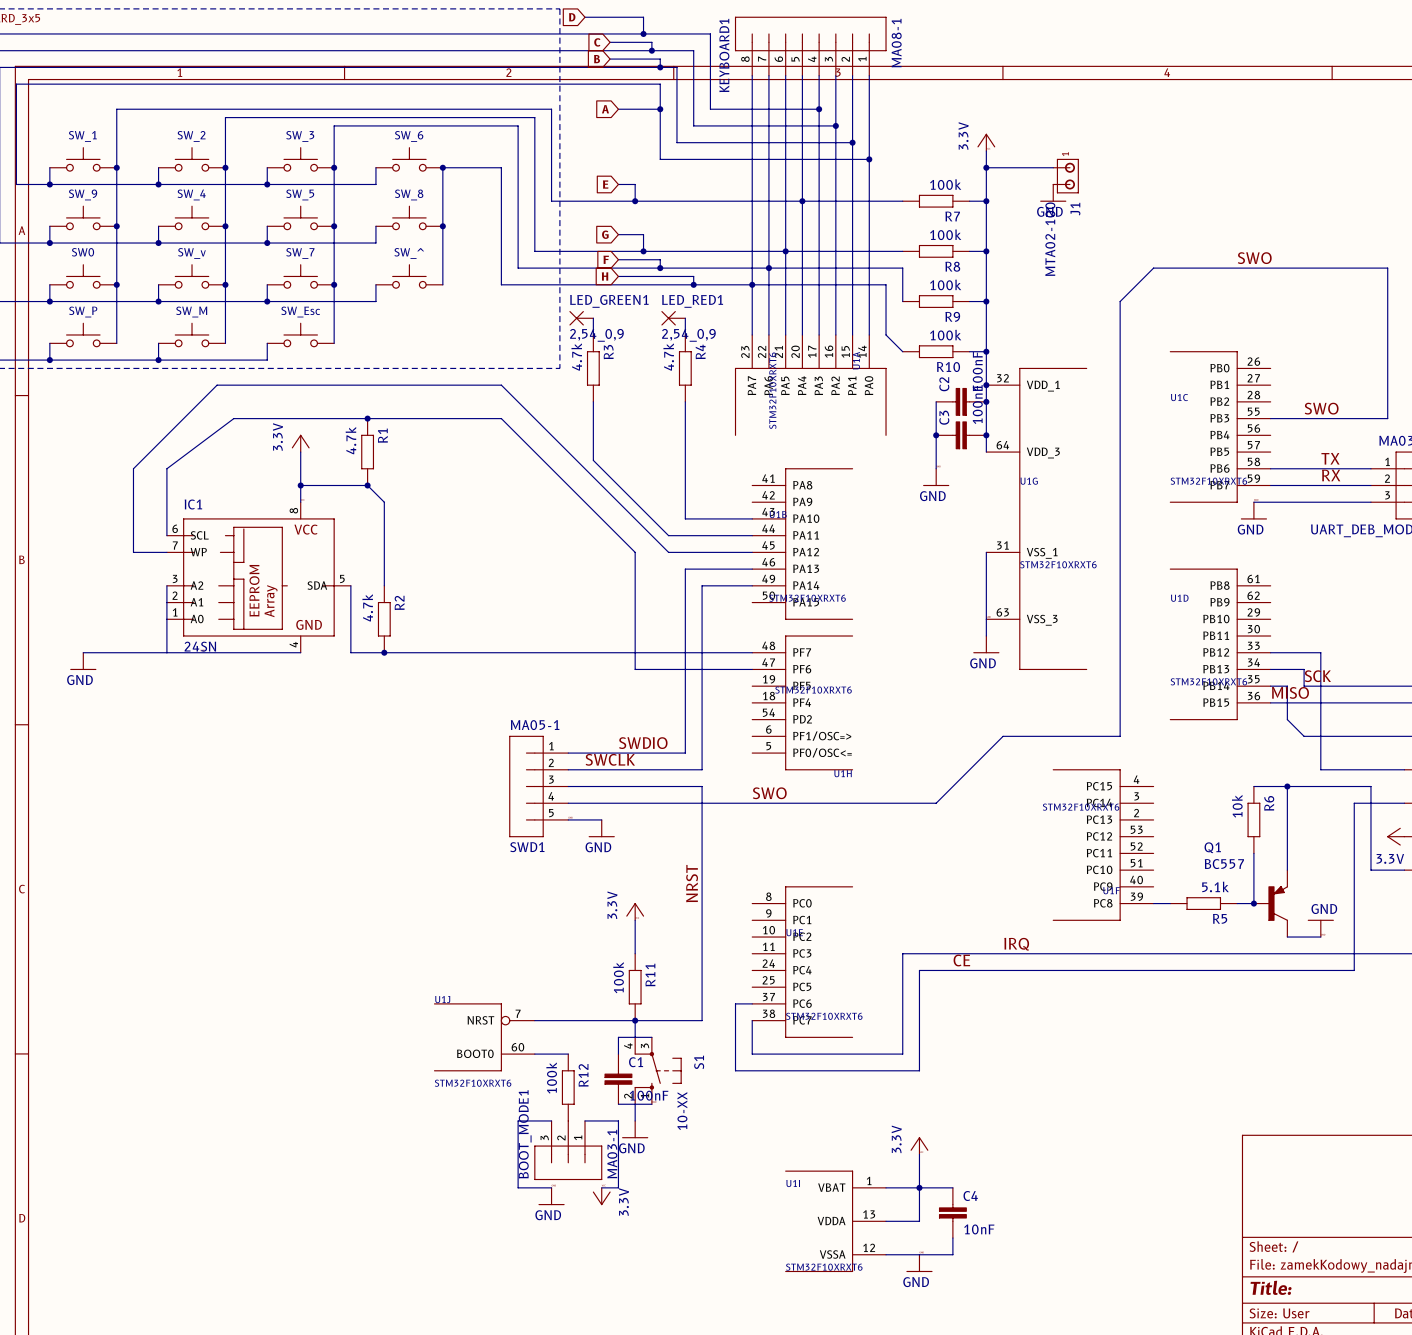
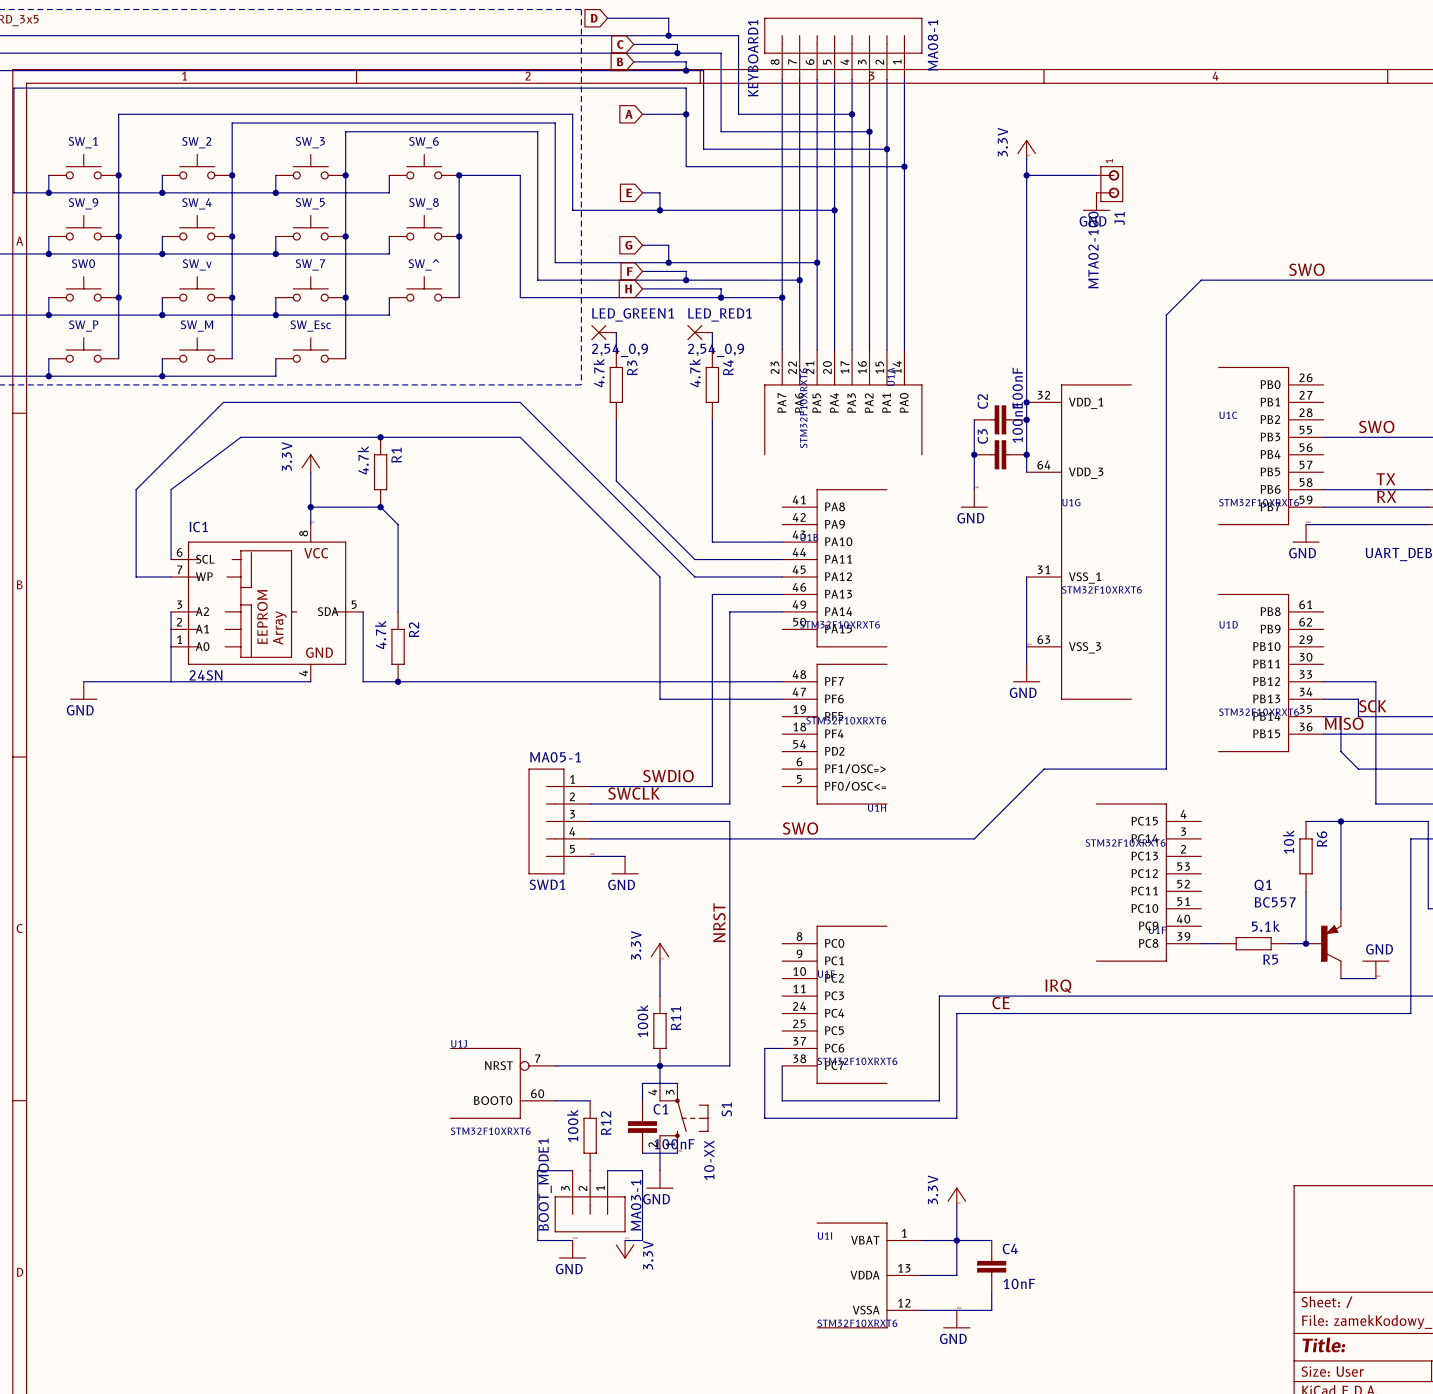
wire: (802, 201) (902, 201) -> none
R7: 100k (936, 201) -> none
wire: (969, 201) (986, 201) -> none
junction: (986, 201) -> none
wire: (785, 251) (902, 251) -> none
R8: 100k (936, 251) -> none
wire: (969, 251) (986, 251) -> none
junction: (986, 251) -> none
wire: (768, 268) (902, 268) (902, 301) -> none
wire: (752, 284) (886, 284) (886, 334) (902, 351) -> none
R9: 100k (936, 301) -> none
wire: (969, 301) (986, 301) -> none
junction: (986, 301) -> none
R10: 100k (936, 351) -> none
wire: (969, 351) (986, 351) -> none
junction: (986, 351) -> none

